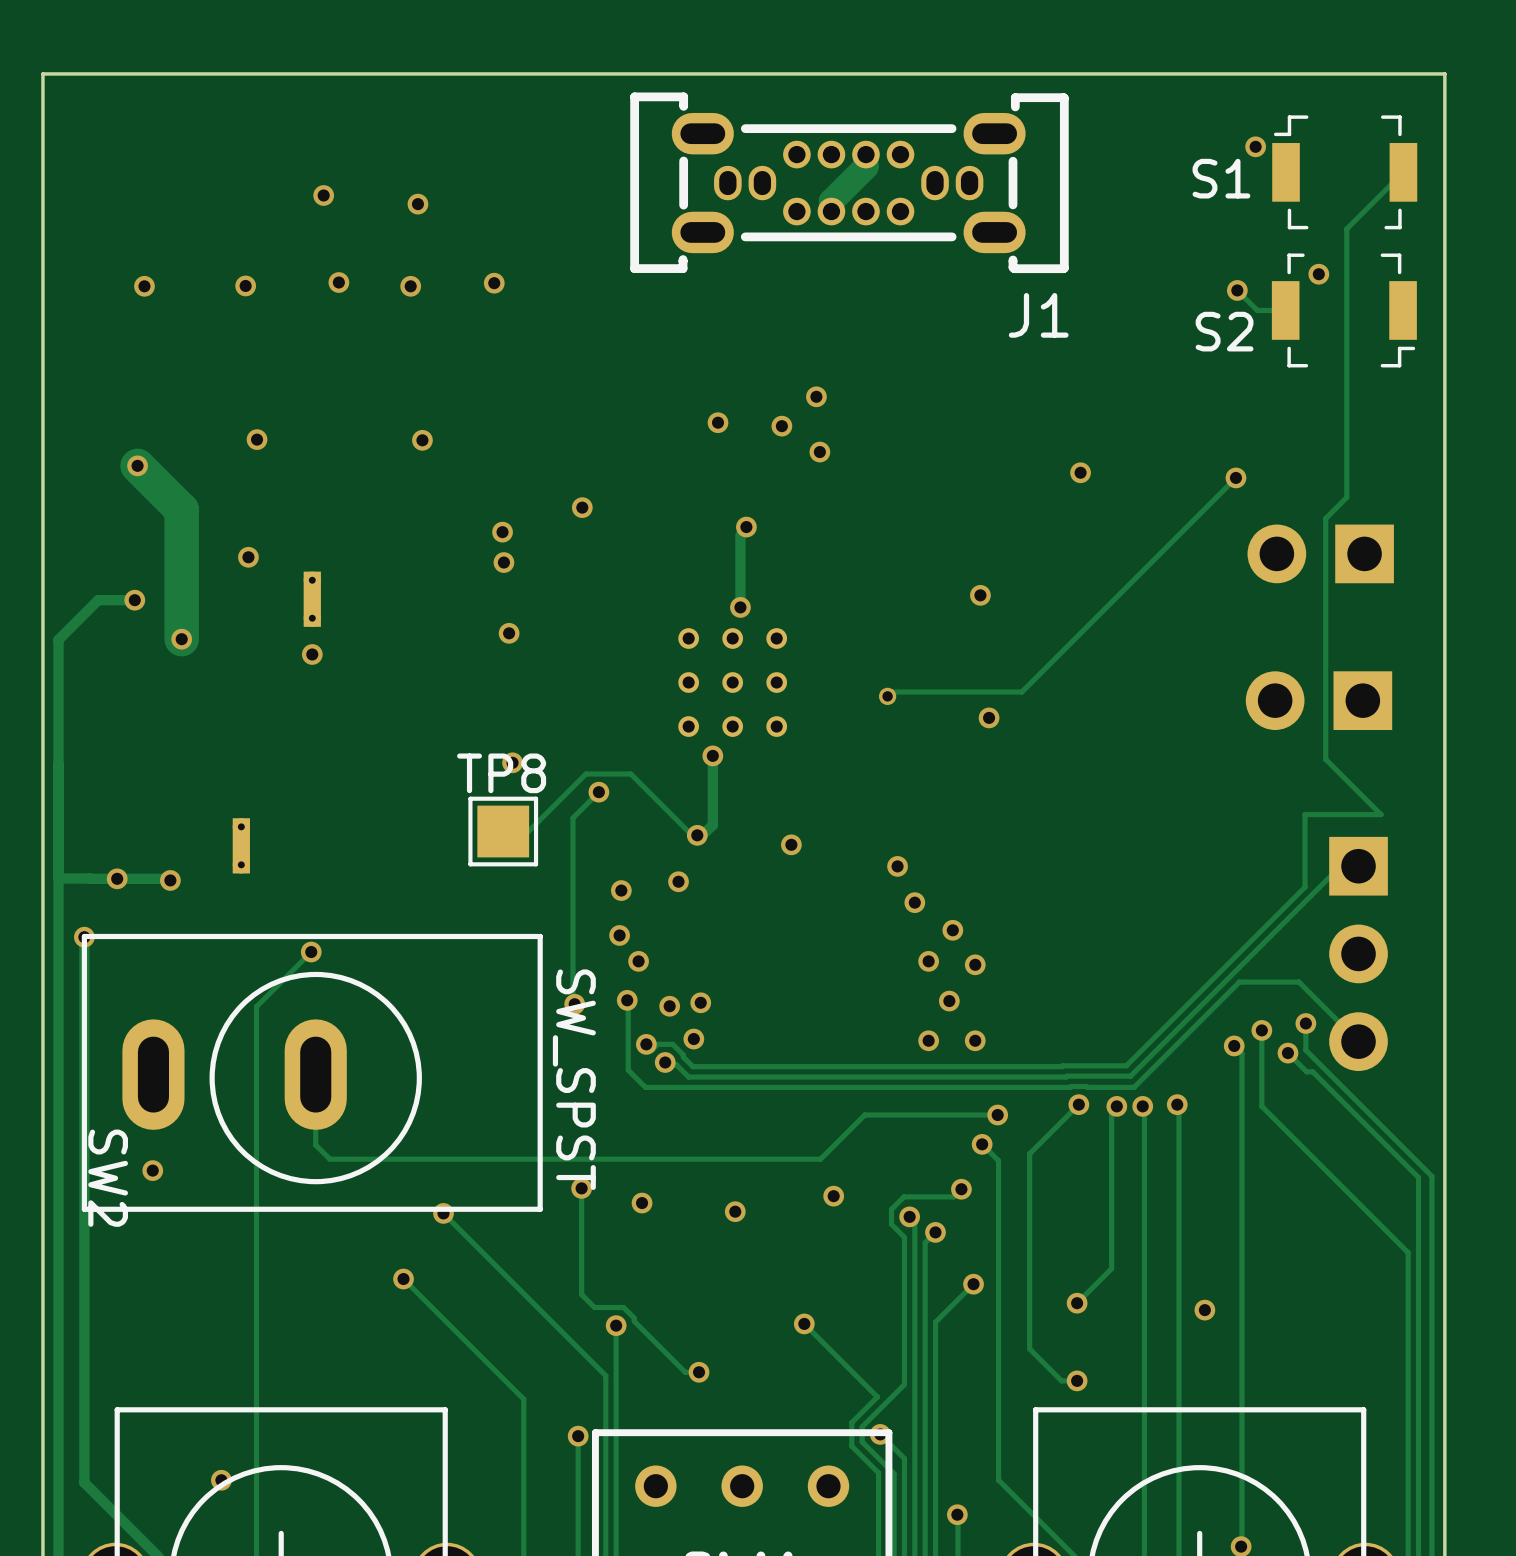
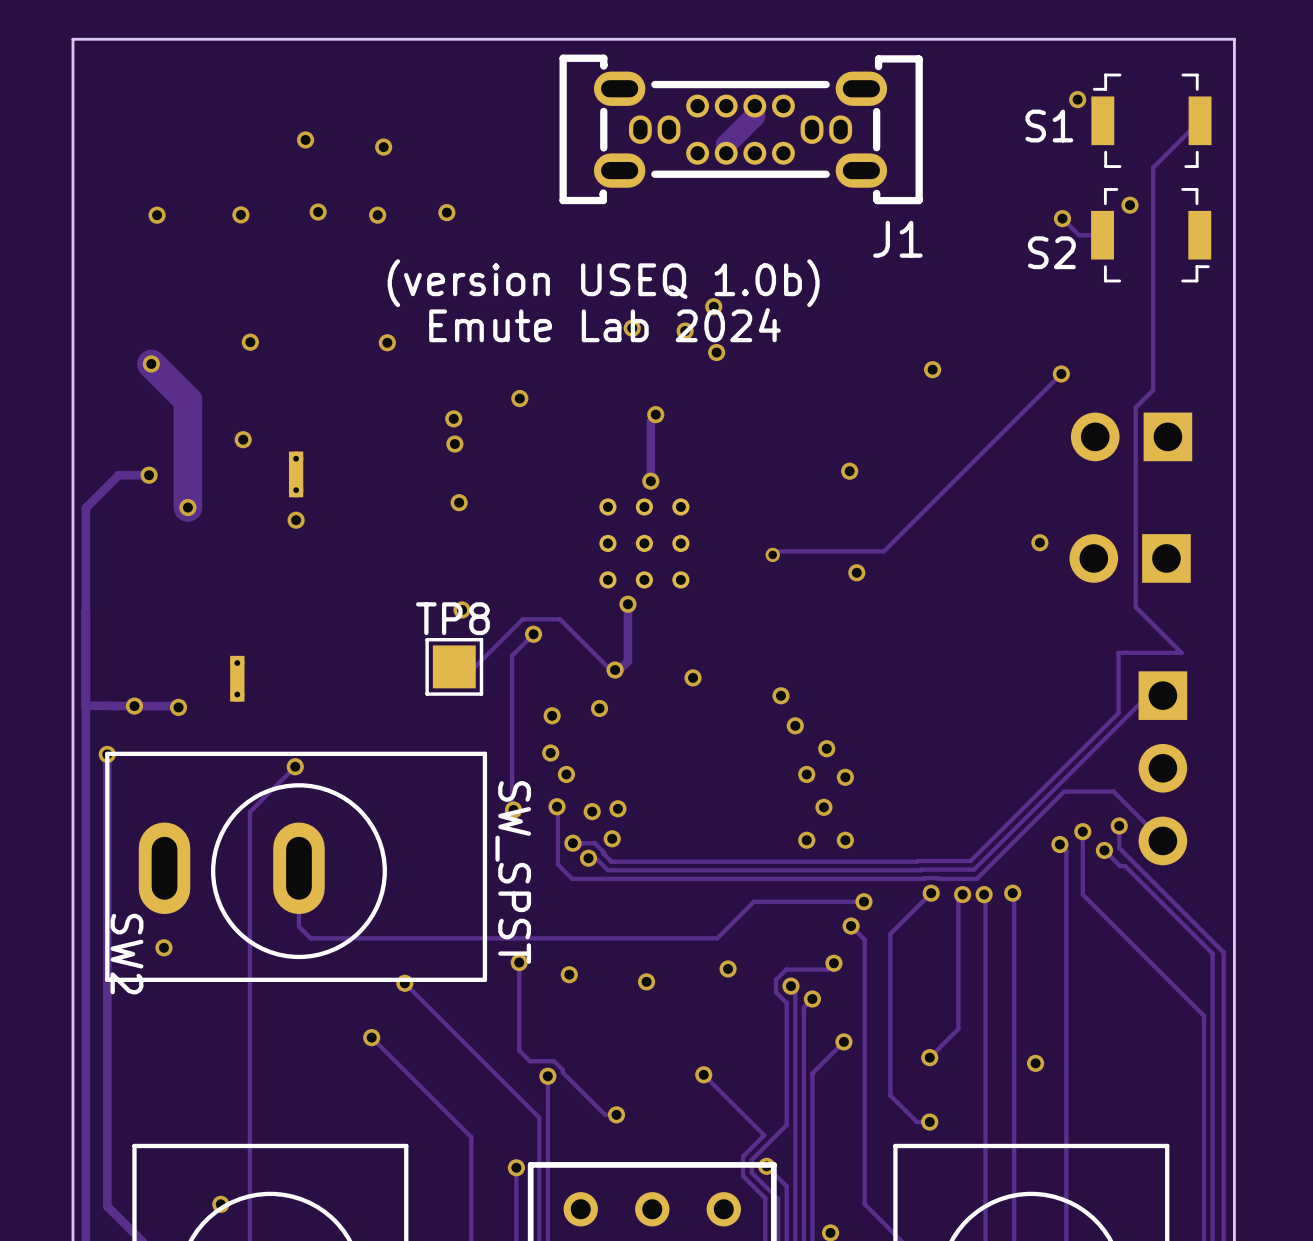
text: none -> (version USEQ 1.0b) (603, 283)
text: none -> Emute Lab 2024 (605, 325)
via: none -> (1039, 542)

